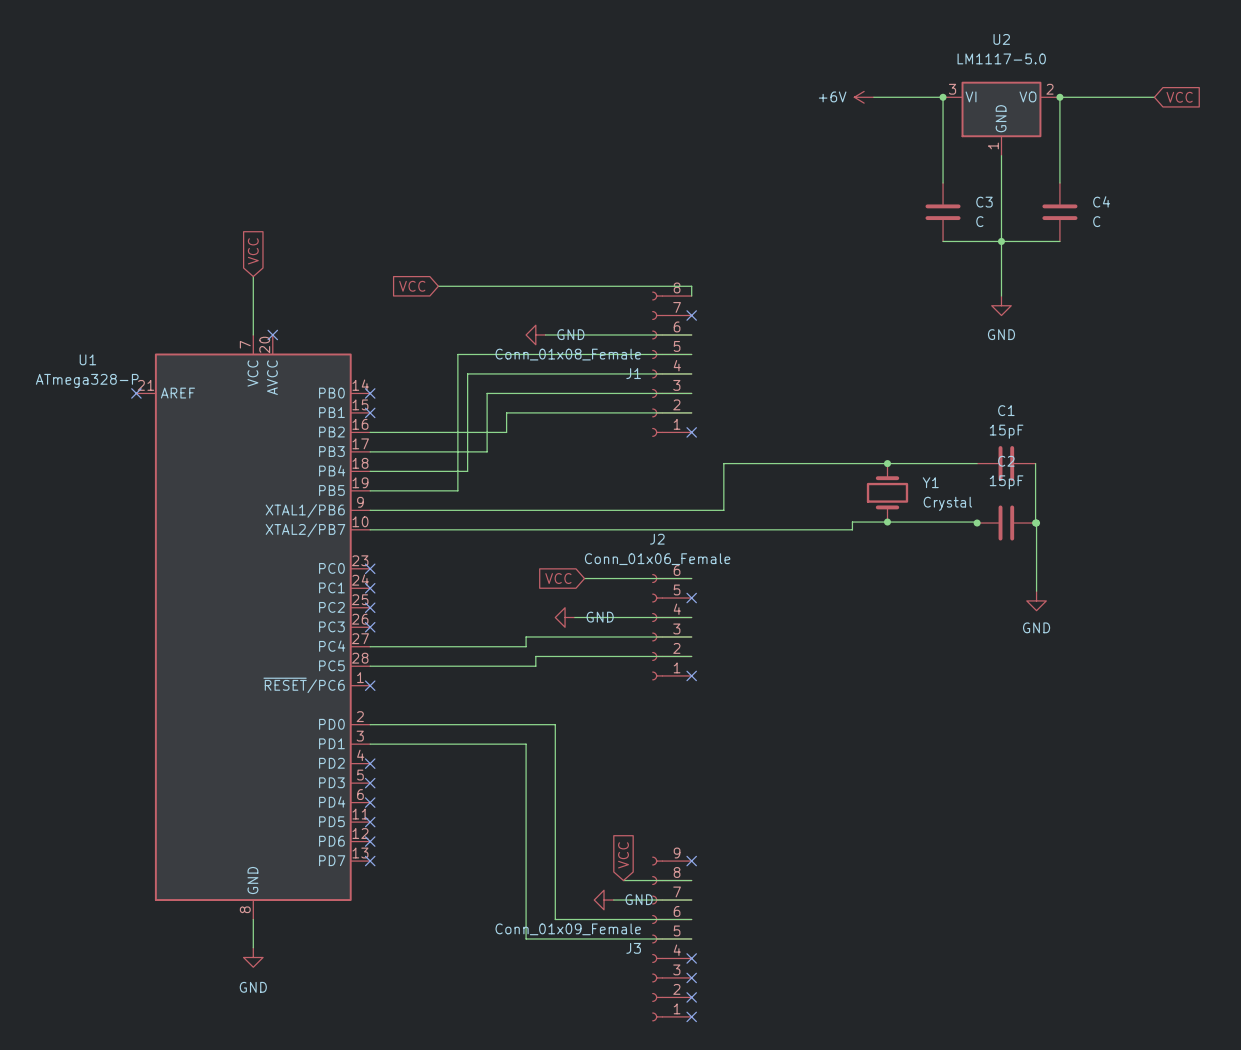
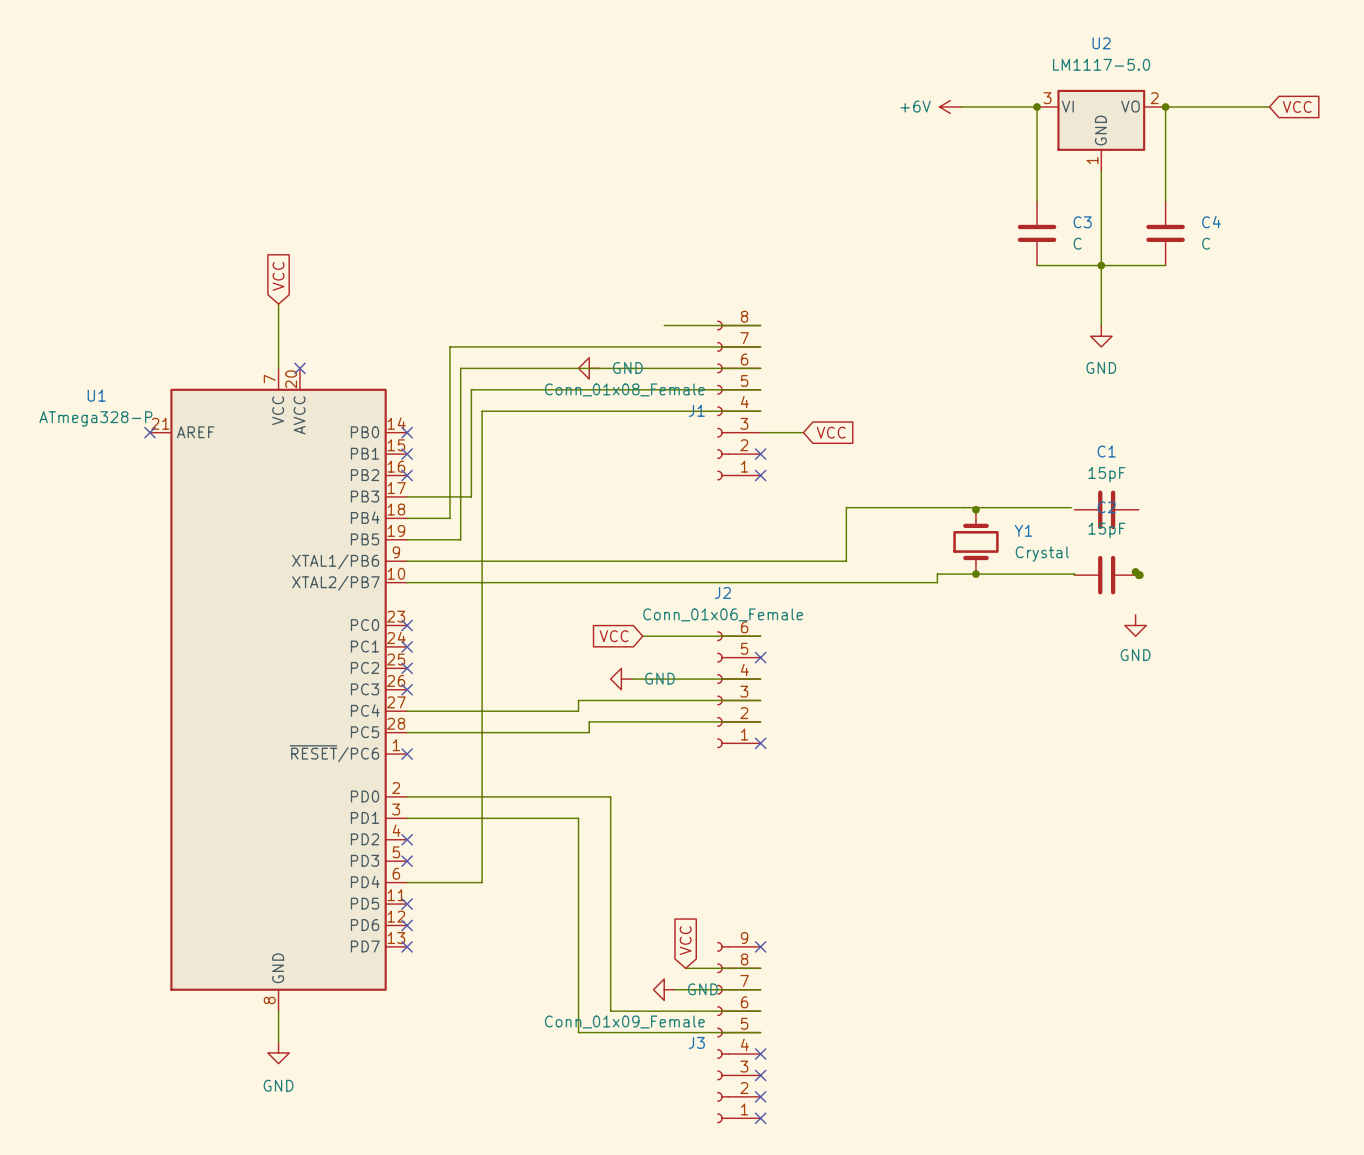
global label: VCC (412, 286) -> none
wire: (438, 286) (691, 286) (691, 296) -> (664, 325) (760, 325)
no-connect mark: (691, 315) -> none
wire: none -> (599, 368) (460, 368) (460, 539)
wire: (457, 354) (457, 490) (418, 490) -> (503, 389) (471, 389) (471, 496)
wire: (467, 373) (467, 471) (409, 471) -> (760, 346) (449, 346) (449, 518)
wire: none -> (514, 411) (482, 411) (482, 882) (407, 882)
wire: (691, 393) (487, 393) (487, 451) (428, 451) -> (760, 432) (803, 432)
global label: none -> VCC (831, 432)
wire: (691, 412) (506, 412) (506, 432) (370, 432) -> none
no-connect mark: none -> (760, 454)
no-connect mark: none -> (407, 475)
wire: (977, 463) (723, 463) (723, 510) -> (1071, 507) (846, 507) (846, 561) (795, 561)
wire: (1035, 463) (1036, 591) -> none
junction: none -> (1135, 571)
junction: (977, 523) -> none
power symbol position: GND (1036, 600) -> GND (1135, 625)
no-connect mark: (370, 802) -> none

